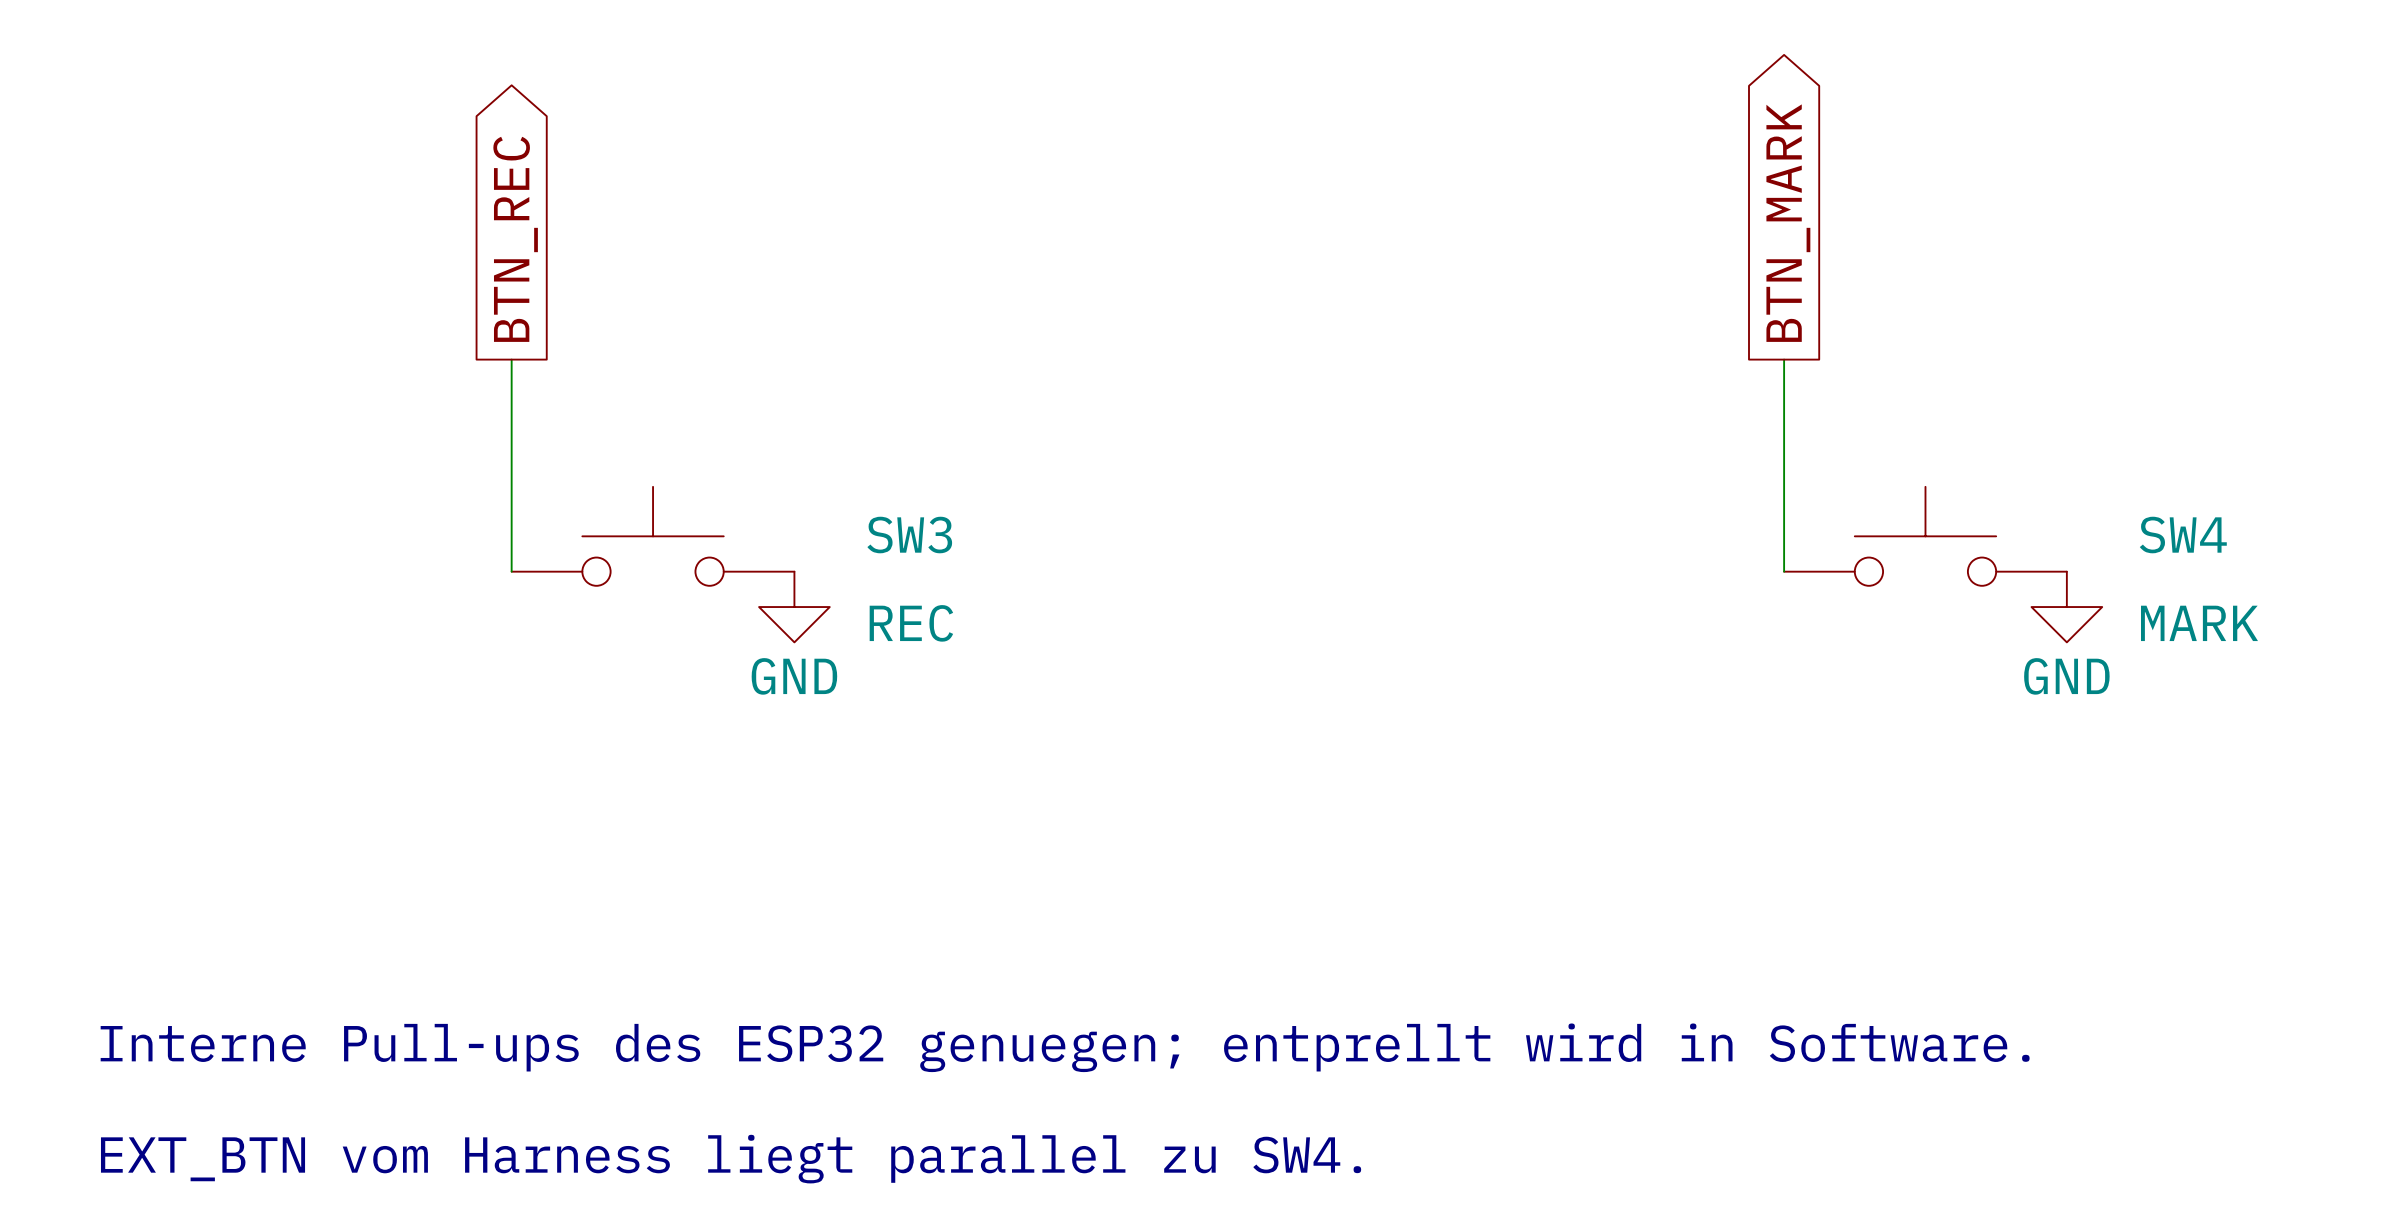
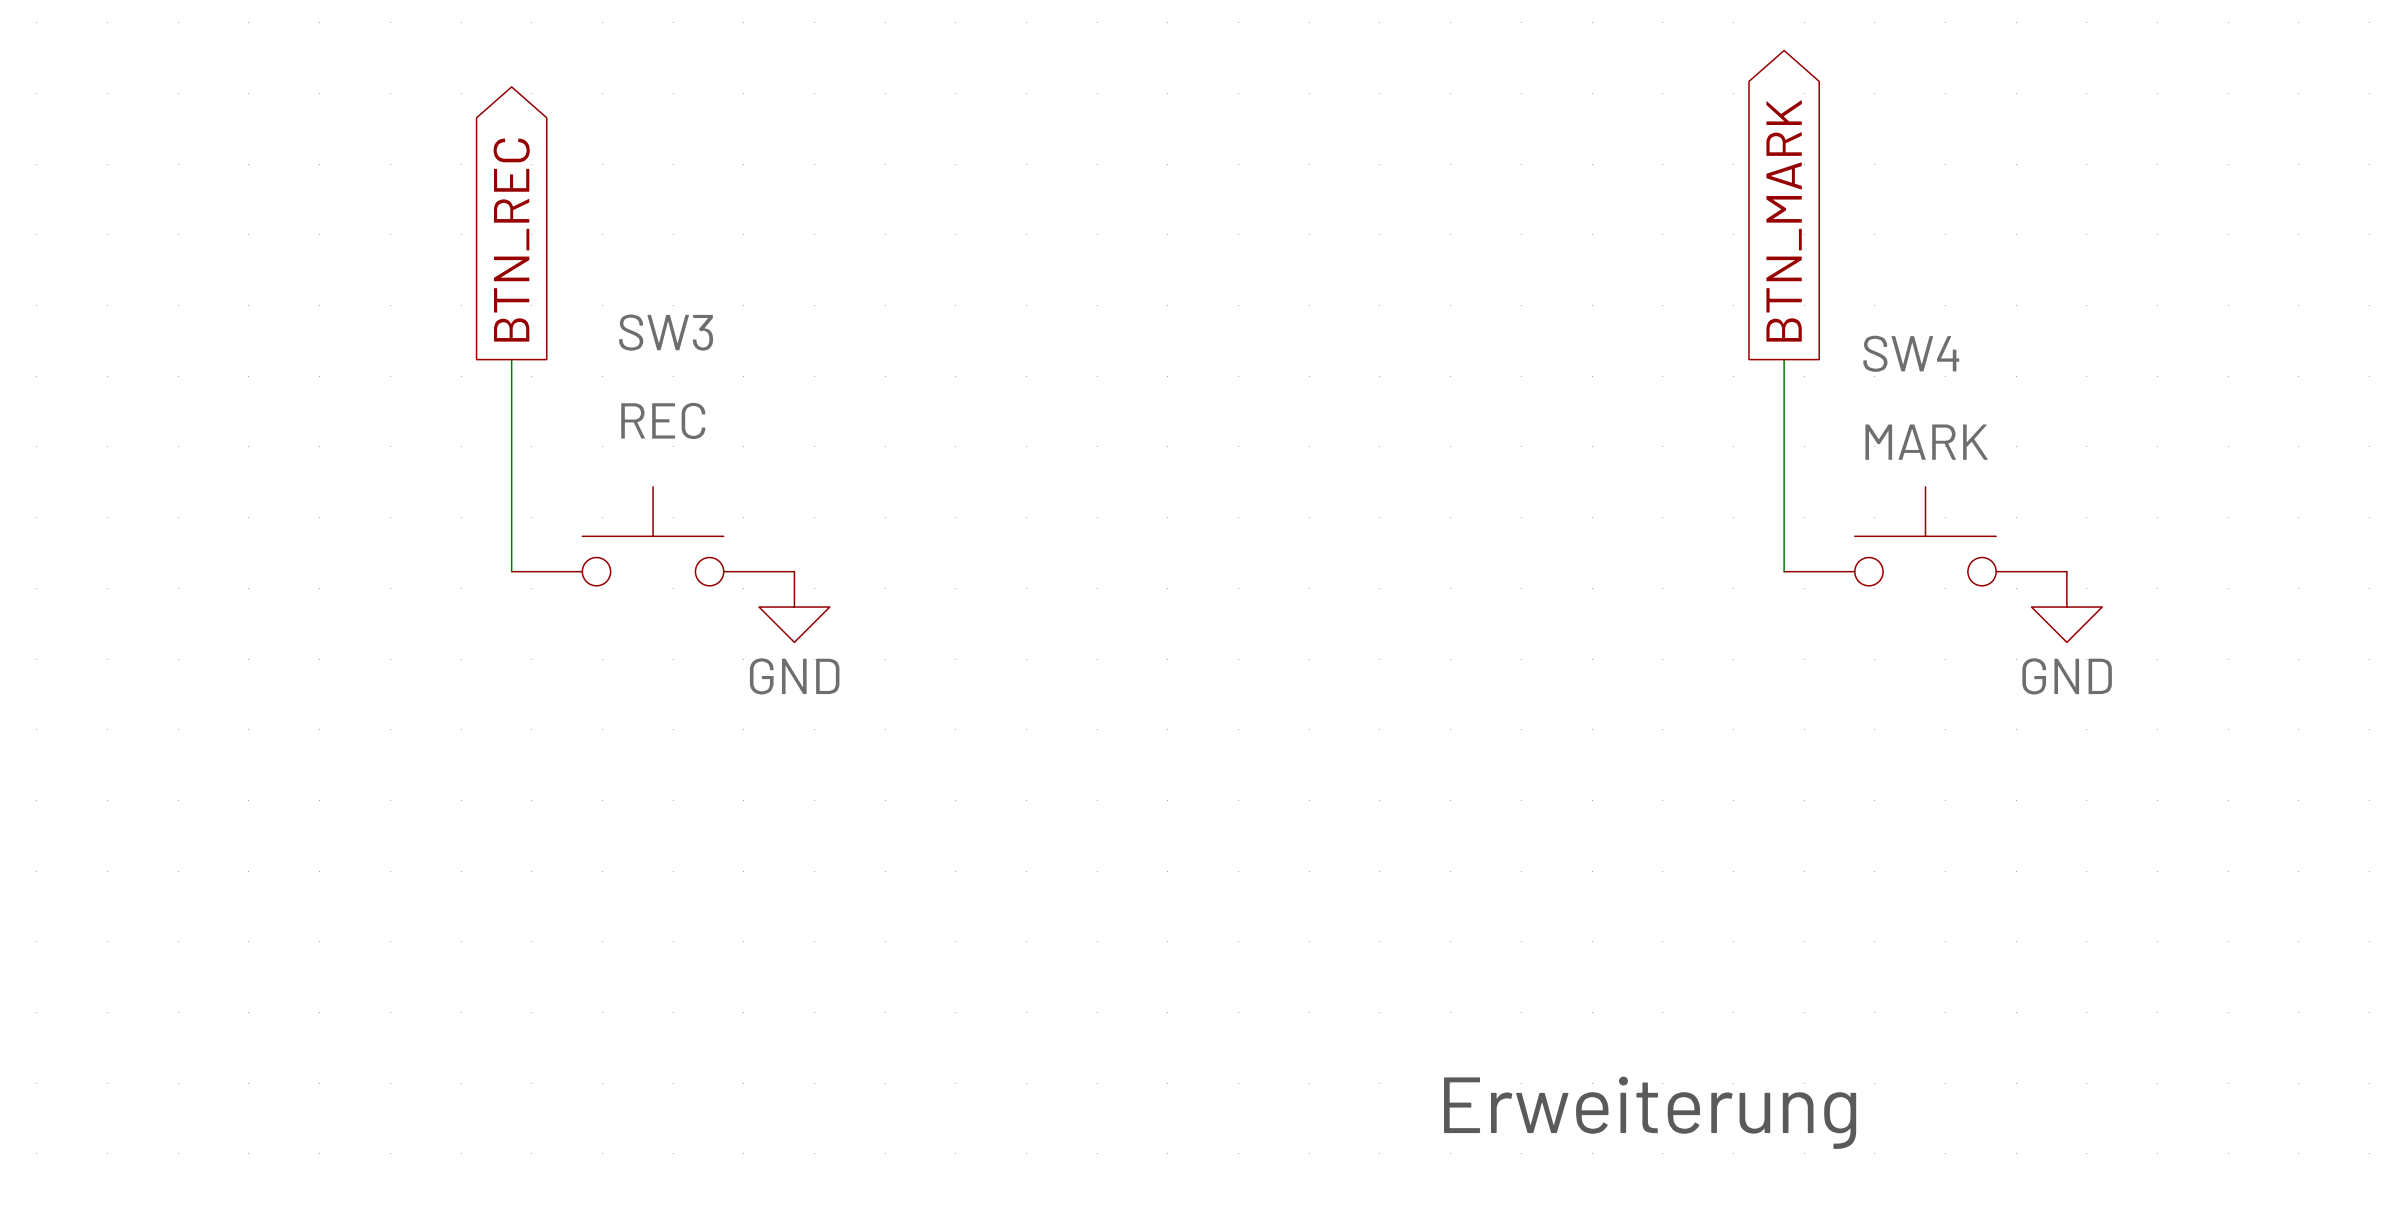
SW3 name position: SW3 (909, 535) -> SW3 (666, 332)
SW4 name position: SW4 (2183, 535) -> SW4 (1911, 353)
SW3 value position: REC (911, 623) -> REC (663, 420)
SW4 value position: MARK (2199, 623) -> MARK (1926, 442)
text: Interne Pull-ups des ESP32 genuegen; entprellt wird in Software. (1065, 1047) -> none
text: none -> Erweiterung (1650, 1112)
text: EXT_BTN vom Harness liegt parallel zu SW4. (731, 1159) -> none

